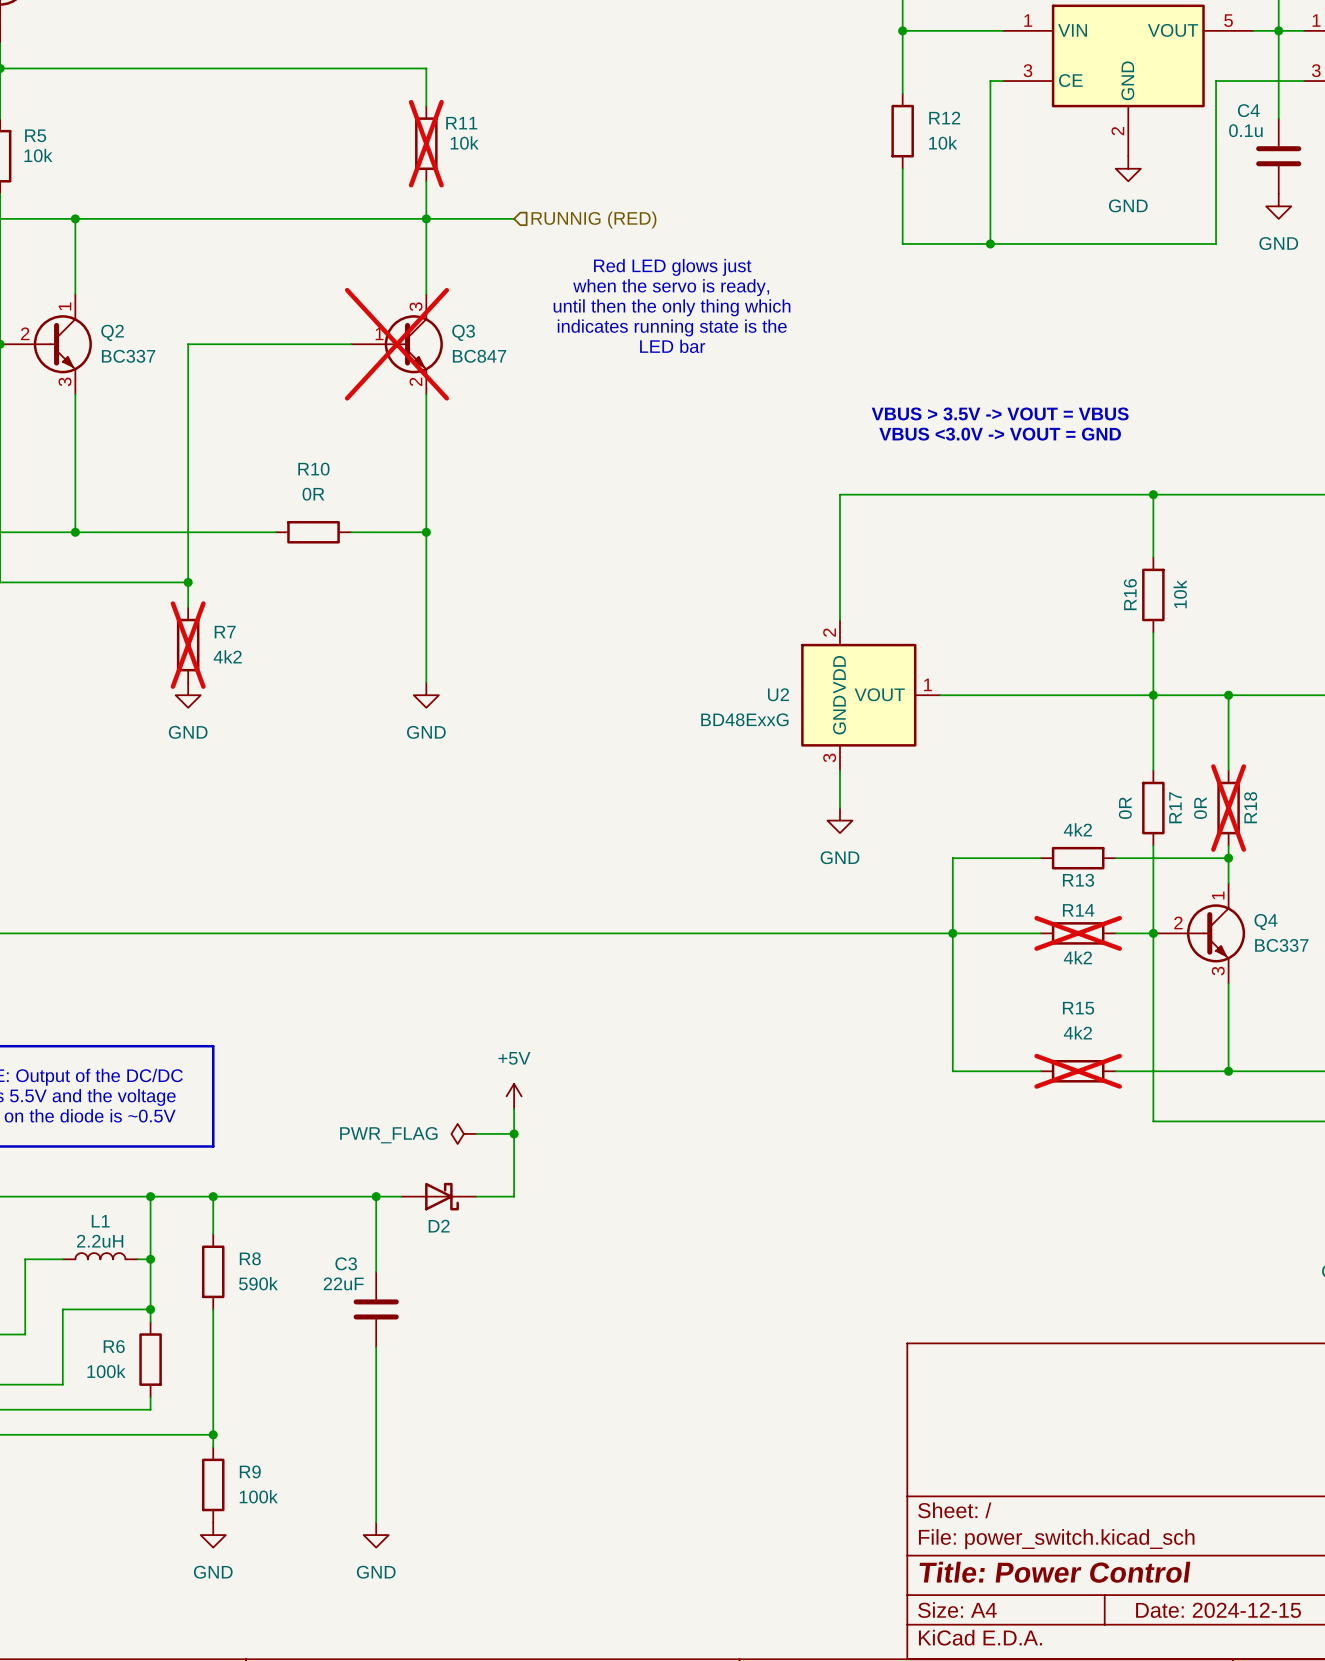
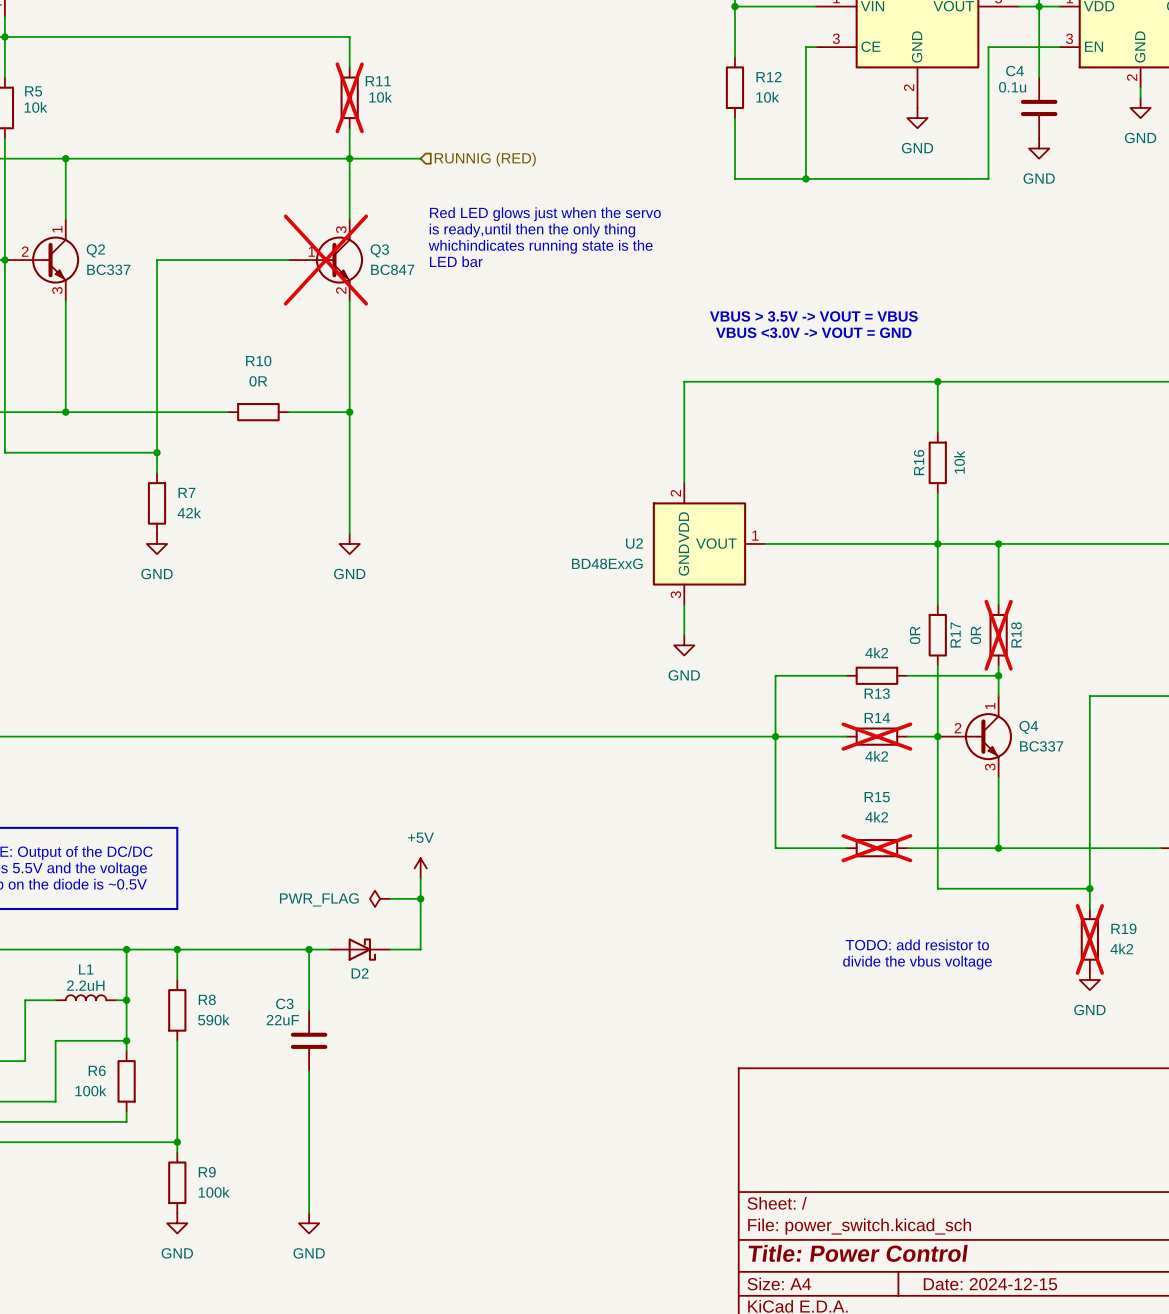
text: Red LED glows just (672, 267) -> Red LED glows just when the servo (545, 214)
text: when the servo is ready, (671, 287) -> none
text: until then the only thing which (672, 307) -> is ready,until then the only thing (532, 230)
text: indicates running state is the (672, 327) -> whichindicates running state is the (540, 246)
text position: LED bar (672, 346) -> LED bar (456, 261)
R7 do-not-place cross: (188, 645) -> none
R7 value: 4k2 (227, 656) -> 42k (189, 512)
text: none -> TODO: add resistor to (917, 944)
text: none -> divide the vbus voltage (917, 962)

